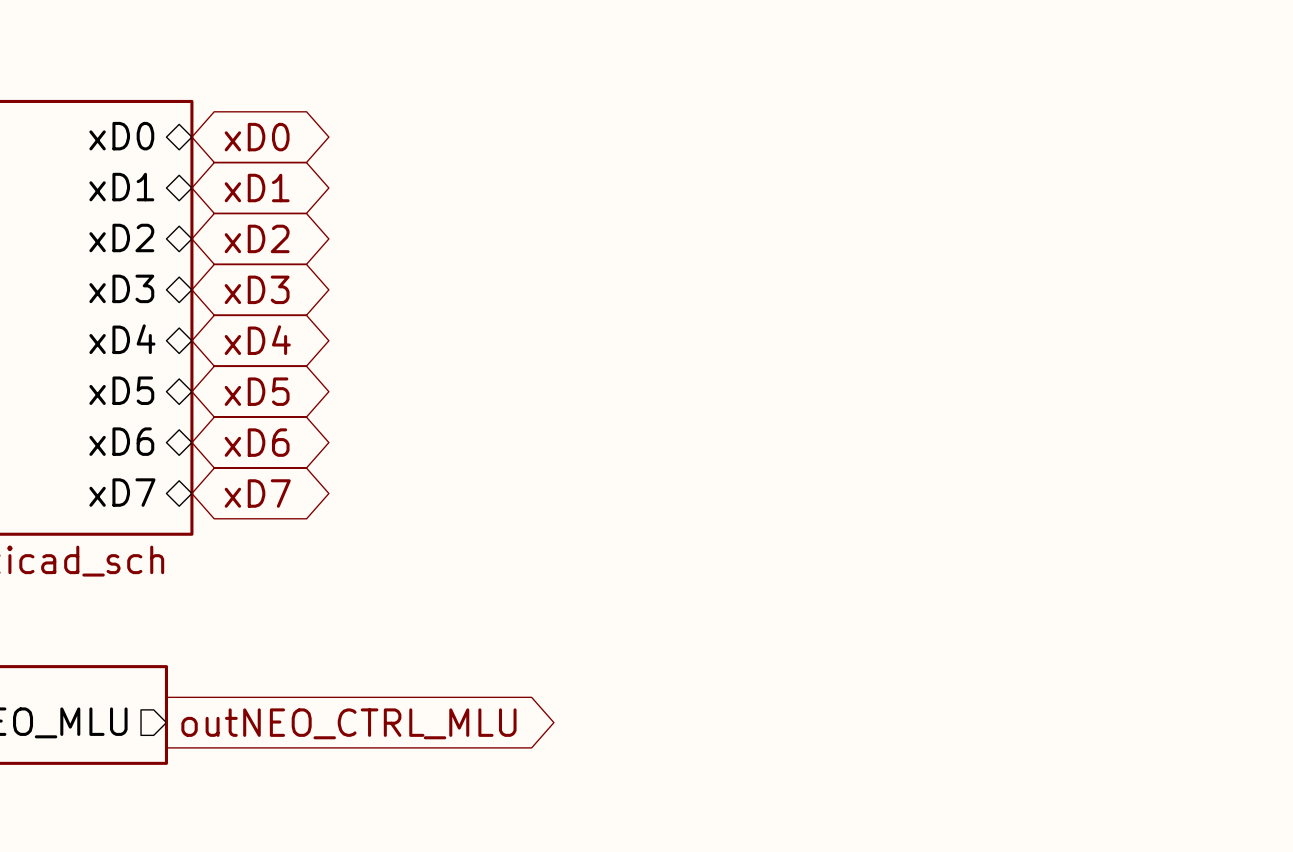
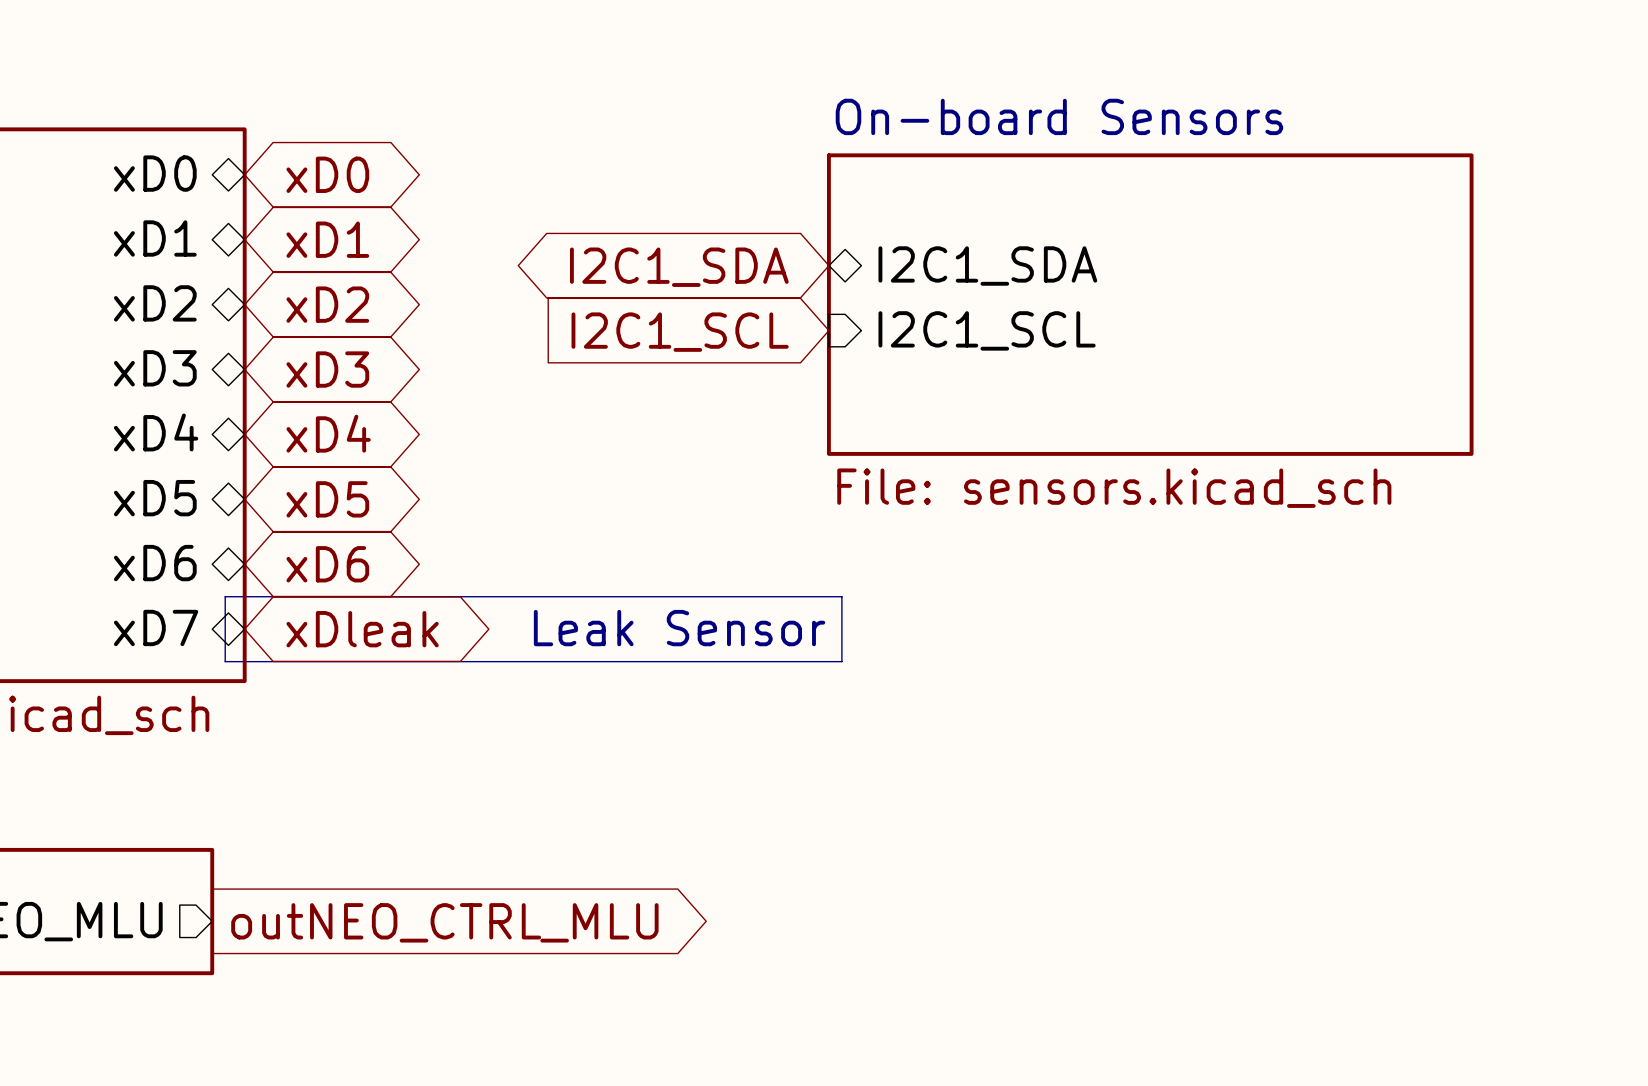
sheet pin: none -> I2C1_SDA (987, 266)
global label: none -> I2C1_SDA (679, 267)
sheet On-board Sensors: none -> File: sensors.kicad_sch (1150, 304)
sheet pin: none -> I2C1_SCL (987, 330)
global label: none -> I2C1_SCL (680, 332)
line: none -> (225, 596) (841, 596) (841, 661) (225, 661) (225, 596)
text: none -> Leak Sensor (679, 628)
global label: xD7 (257, 493) -> xDleak (362, 629)

